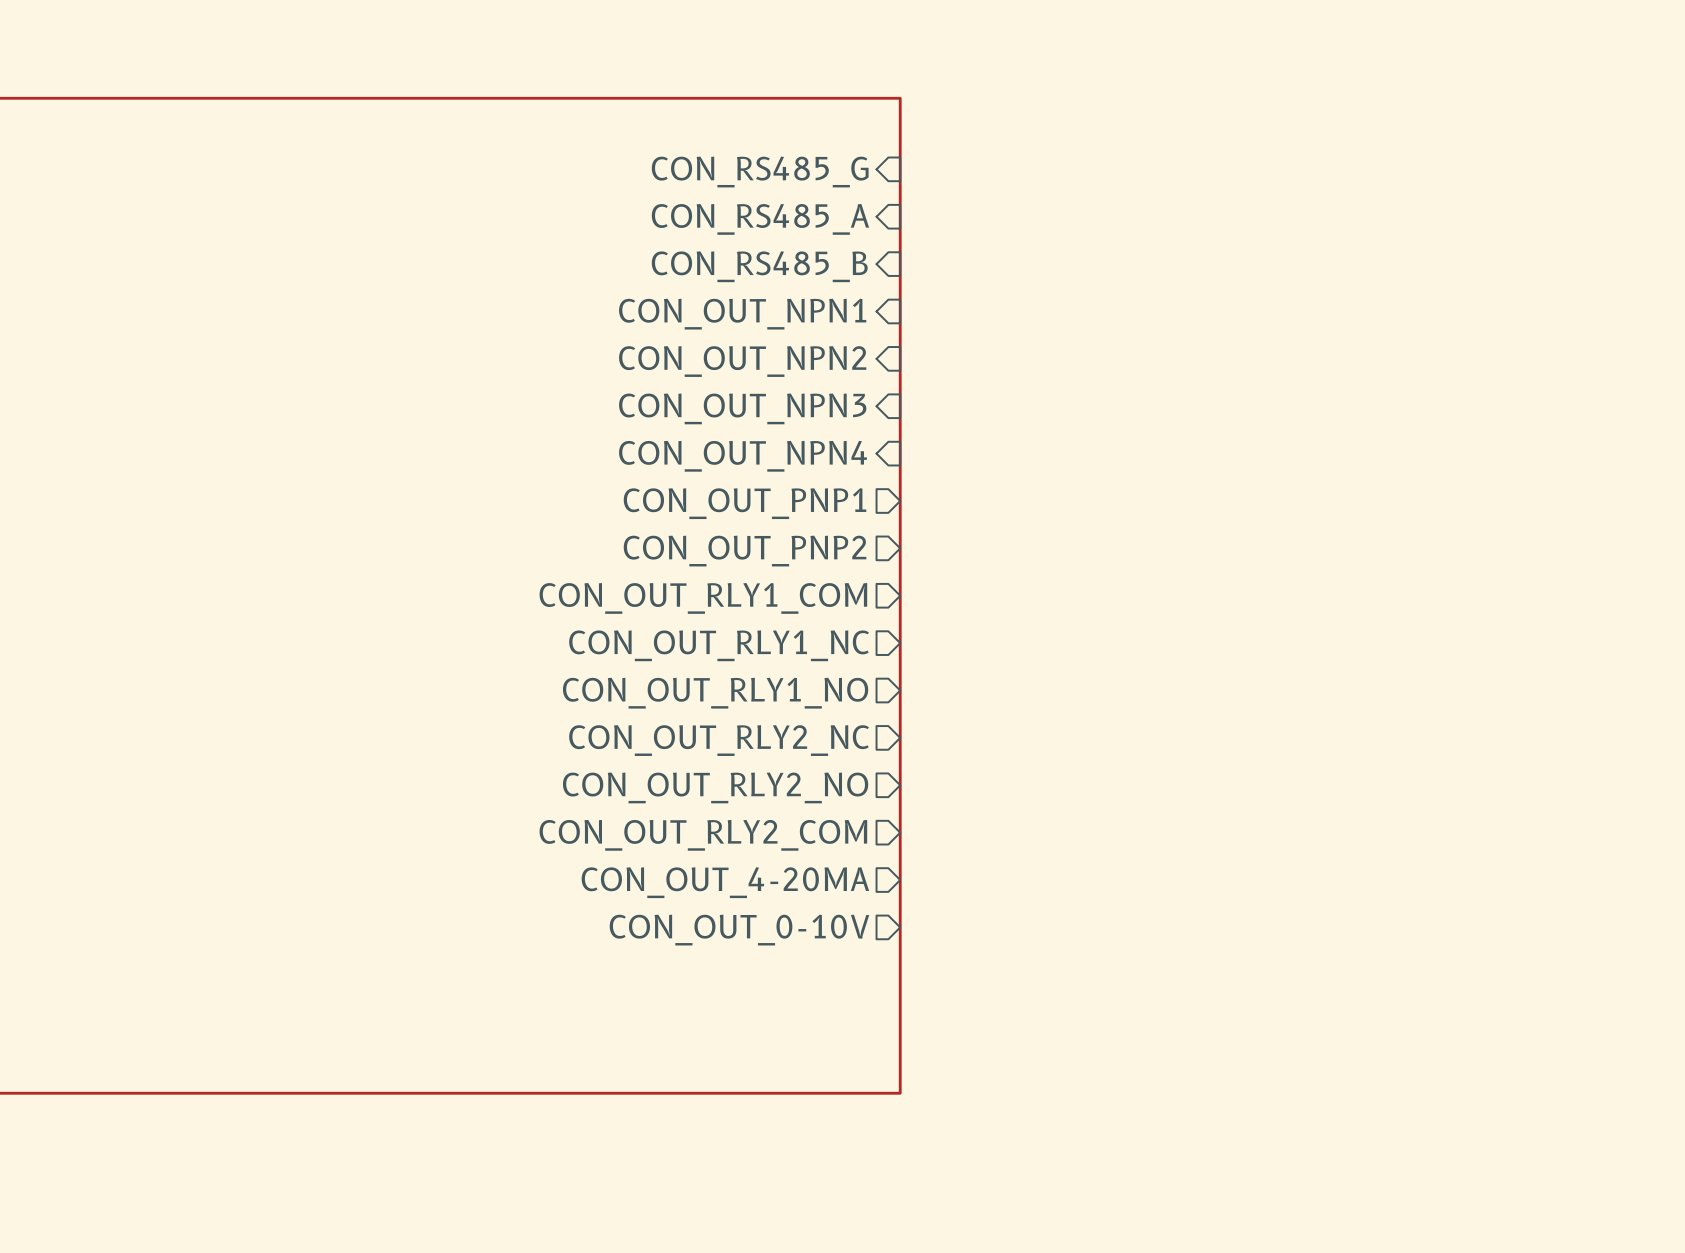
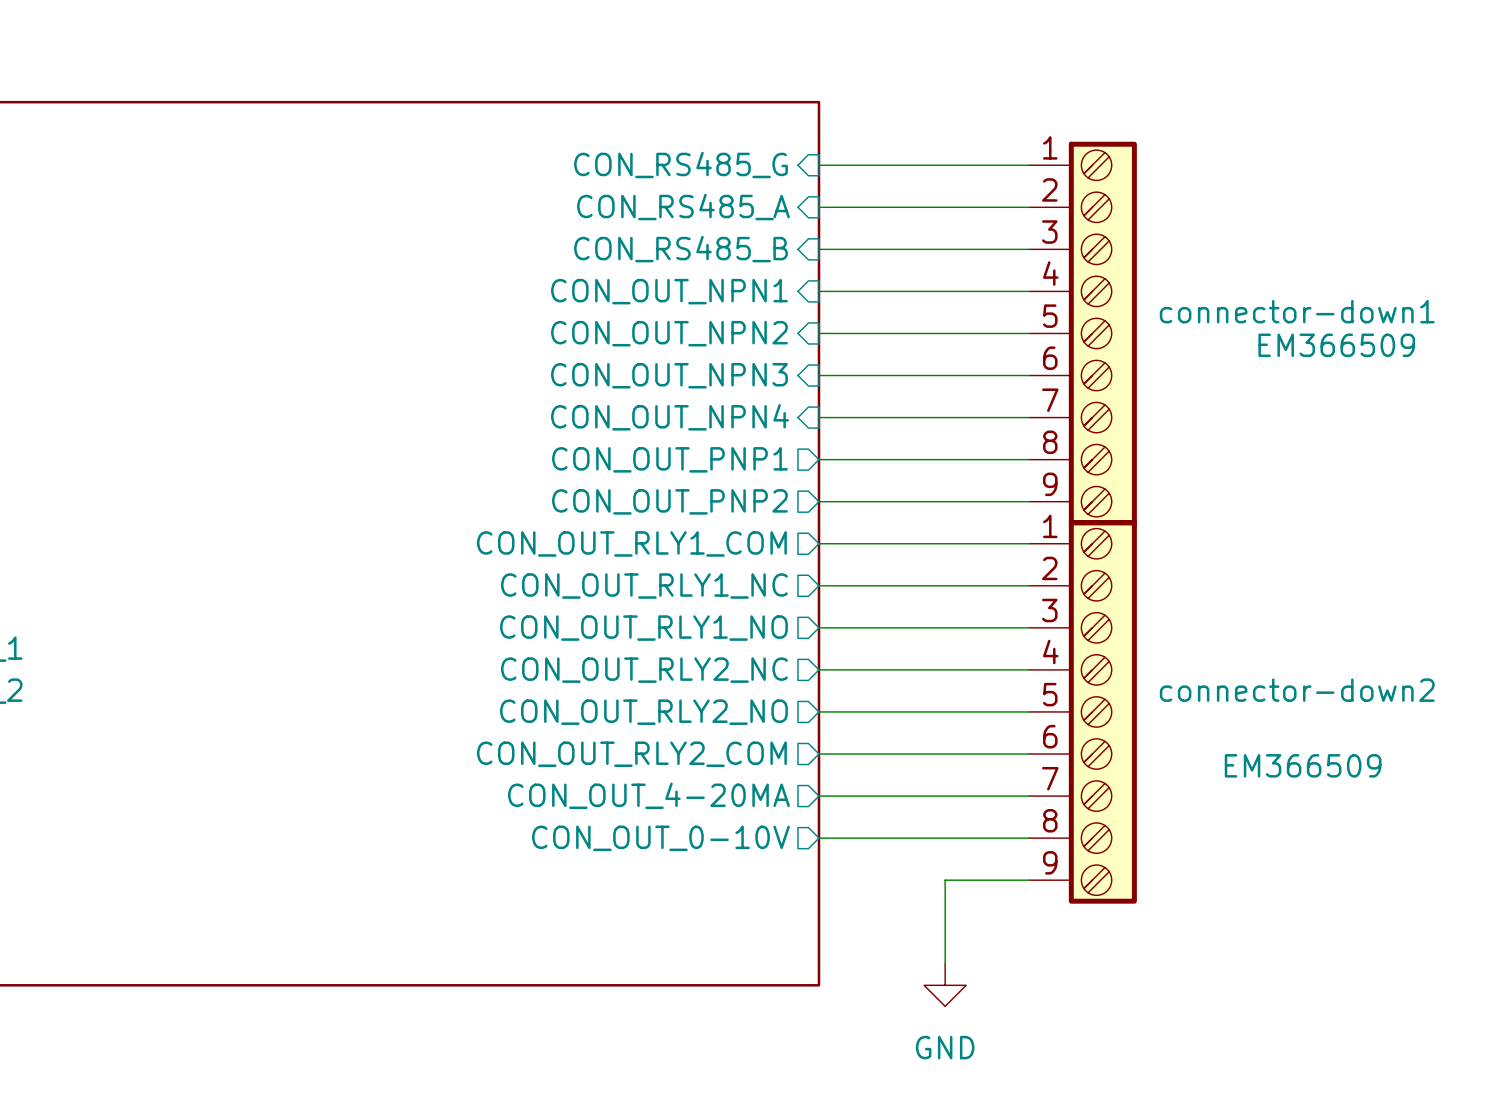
wire: none -> (818, 165) (1029, 165)
wire: none -> (818, 207) (1029, 207)
wire: none -> (818, 249) (1029, 249)
wire: none -> (818, 291) (1029, 291)
wire: none -> (818, 333) (1029, 333)
connector-down1: none -> (1083, 333)
wire: none -> (818, 375) (1029, 375)
wire: none -> (818, 417) (1029, 417)
wire: none -> (818, 459) (1029, 459)
wire: none -> (818, 501) (1029, 501)
wire: none -> (818, 543) (1029, 543)
wire: none -> (818, 585) (1029, 585)
wire: none -> (818, 627) (1029, 627)
wire: none -> (818, 669) (1029, 669)
wire: none -> (818, 711) (1029, 711)
connector-down2: none -> (1083, 711)
wire: none -> (818, 754) (1029, 754)
wire: none -> (818, 796) (1029, 796)
wire: none -> (818, 838) (1029, 838)
wire: none -> (1029, 880) (945, 880) (945, 964)
power symbol: none -> GND (945, 985)

